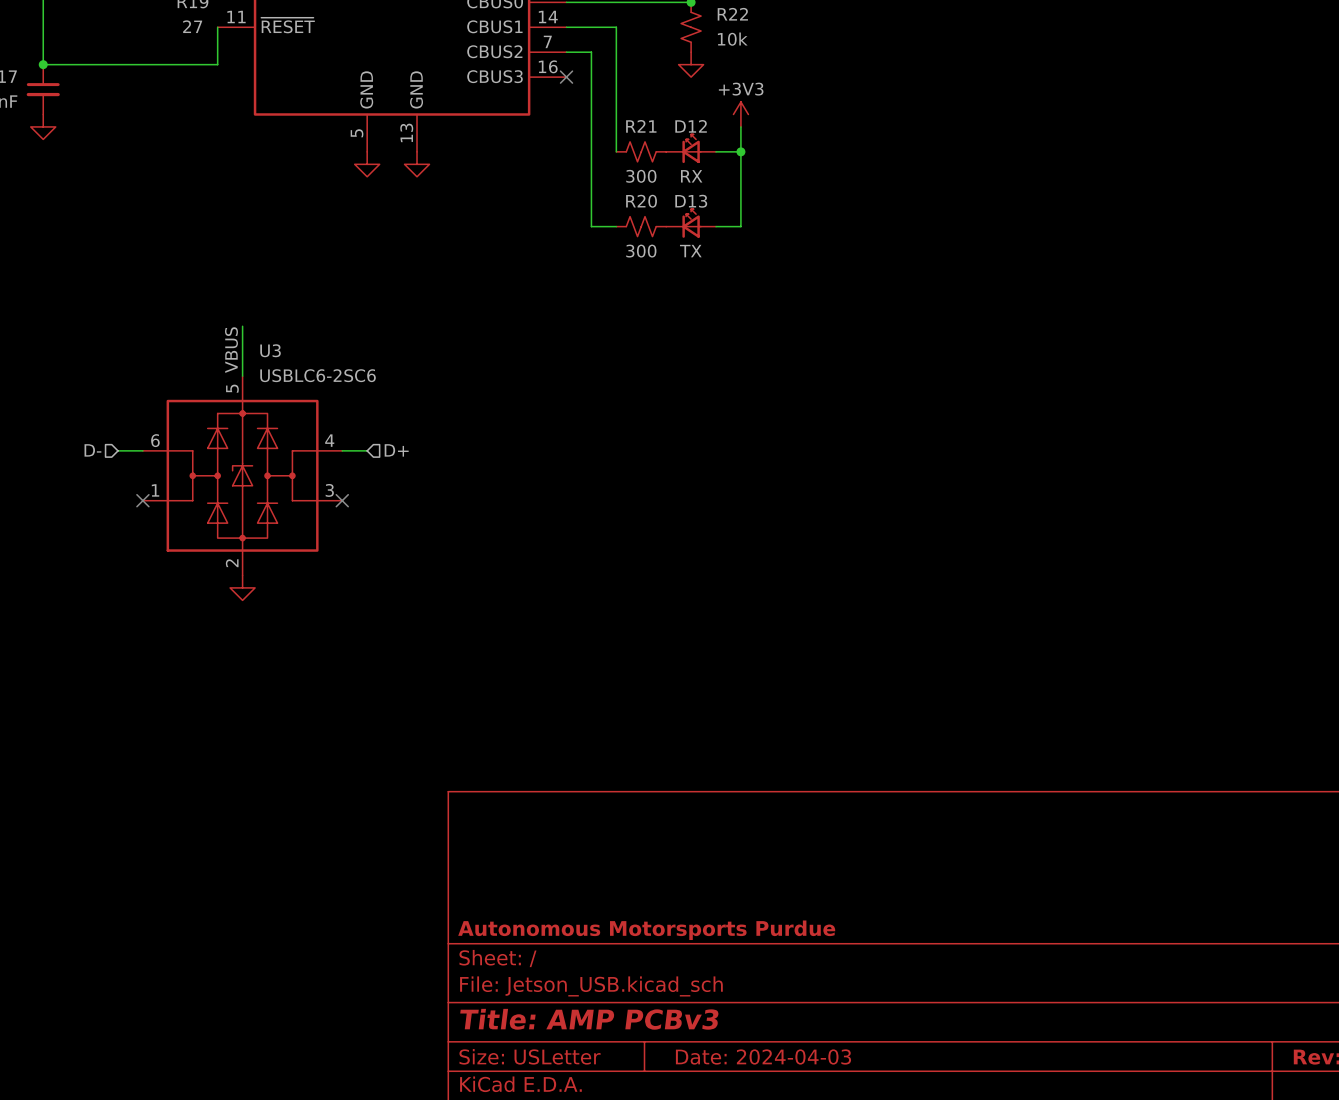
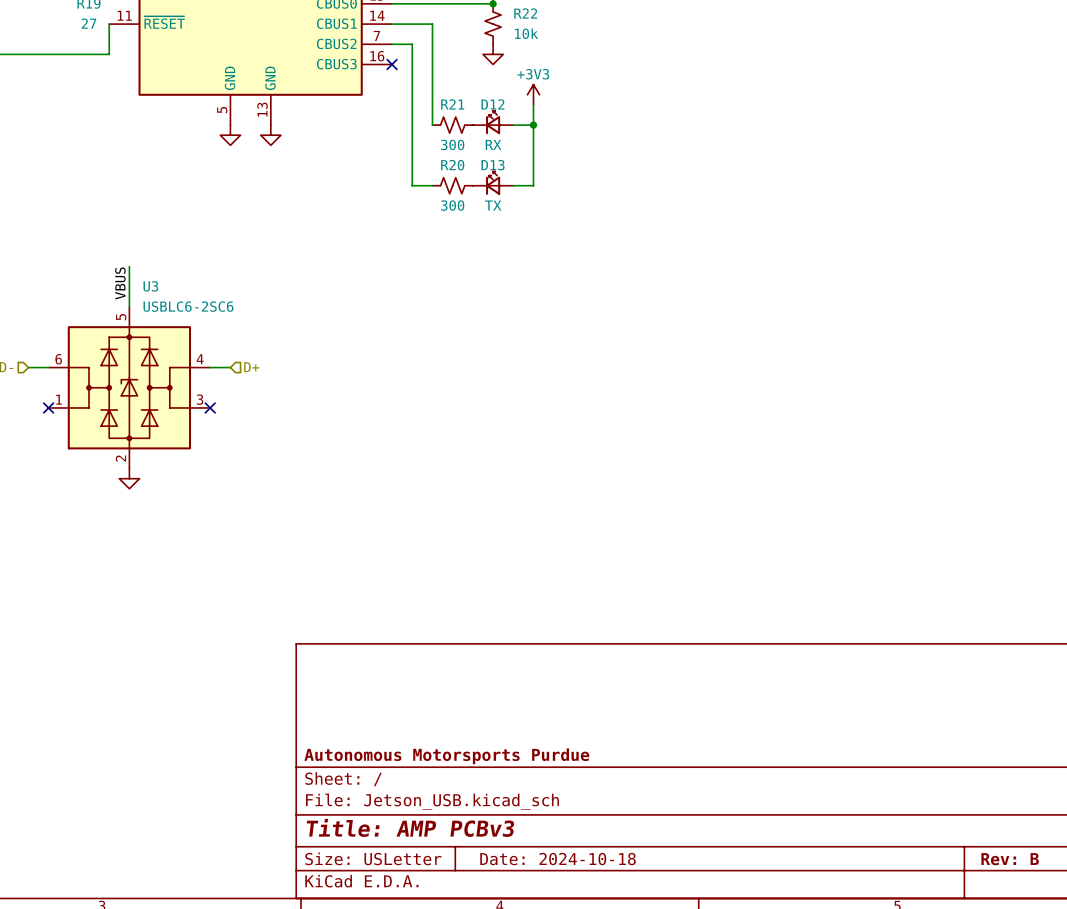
title block: Date: 2024-04-03 (763, 1056) -> Date: 2024-10-18 (558, 859)

